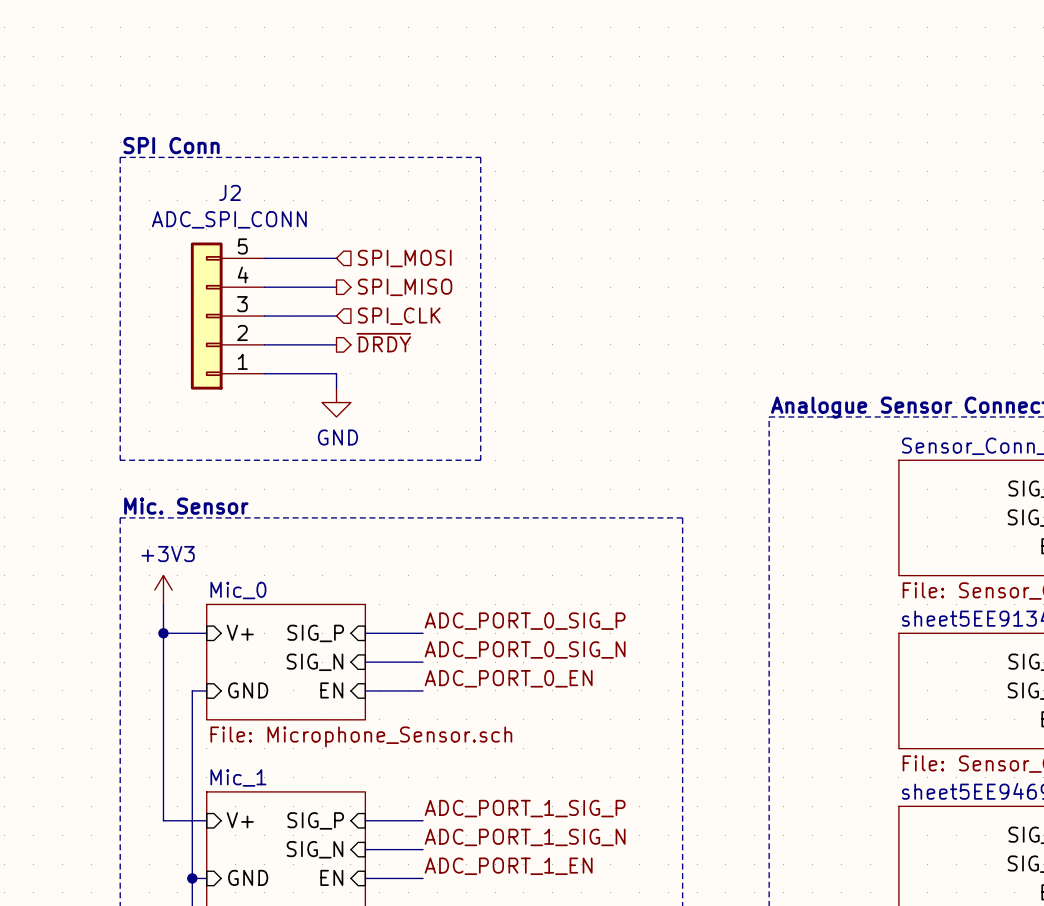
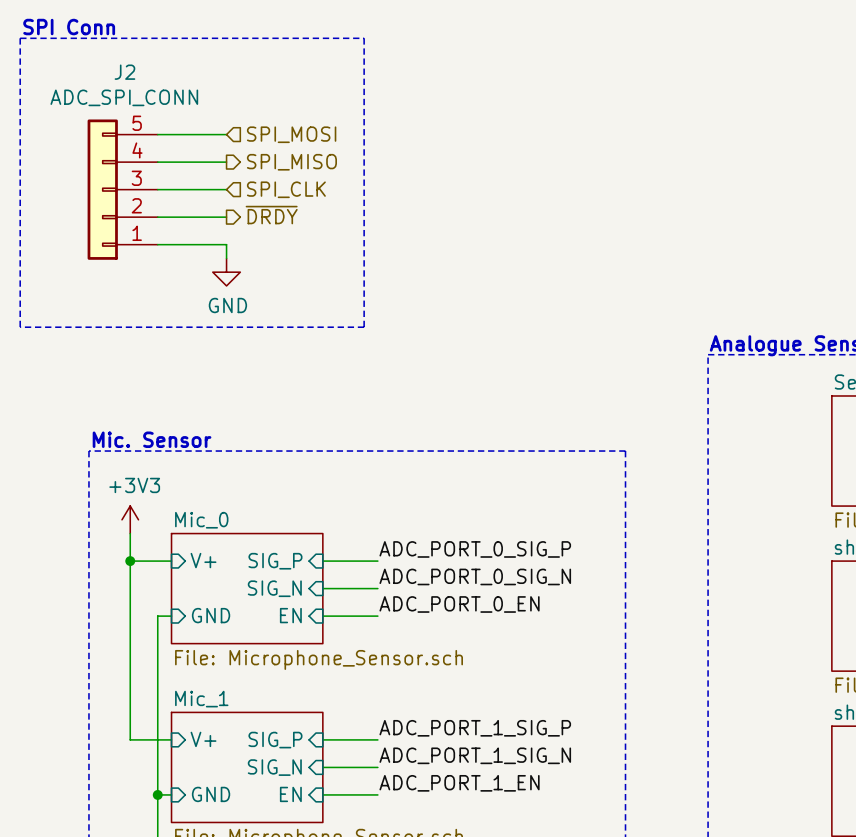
text position: SPI Conn (171, 145) -> SPI Conn (69, 27)
line: (120, 157) (480, 157) (480, 460) (120, 460) (120, 157) -> (20, 38) (364, 38) (364, 327) (20, 327) (20, 38)
wire: none -> (157, 189) (226, 189)
wire: (264, 258) (336, 258) -> (157, 134) (226, 134)
hierarchical label position: SPI_MOSI (404, 258) -> SPI_MOSI (291, 134)
wire: (264, 287) (336, 287) -> (157, 162) (226, 162)
hierarchical label position: SPI_MISO (405, 287) -> SPI_MISO (291, 162)
J2 position: (227, 316) -> (122, 189)
wire: (264, 316) (336, 316) -> (226, 258) (226, 244) (157, 244)
hierarchical label position: SPI_CLK (399, 316) -> SPI_CLK (286, 189)
hierarchical label position: ~{DRDY} (383, 342) -> ~{DRDY} (271, 215)
wire: (264, 344) (336, 344) -> (157, 217) (226, 217)
wire: (264, 373) (336, 373) (336, 388) -> none
power symbol position: GND (336, 402) -> GND (226, 272)

